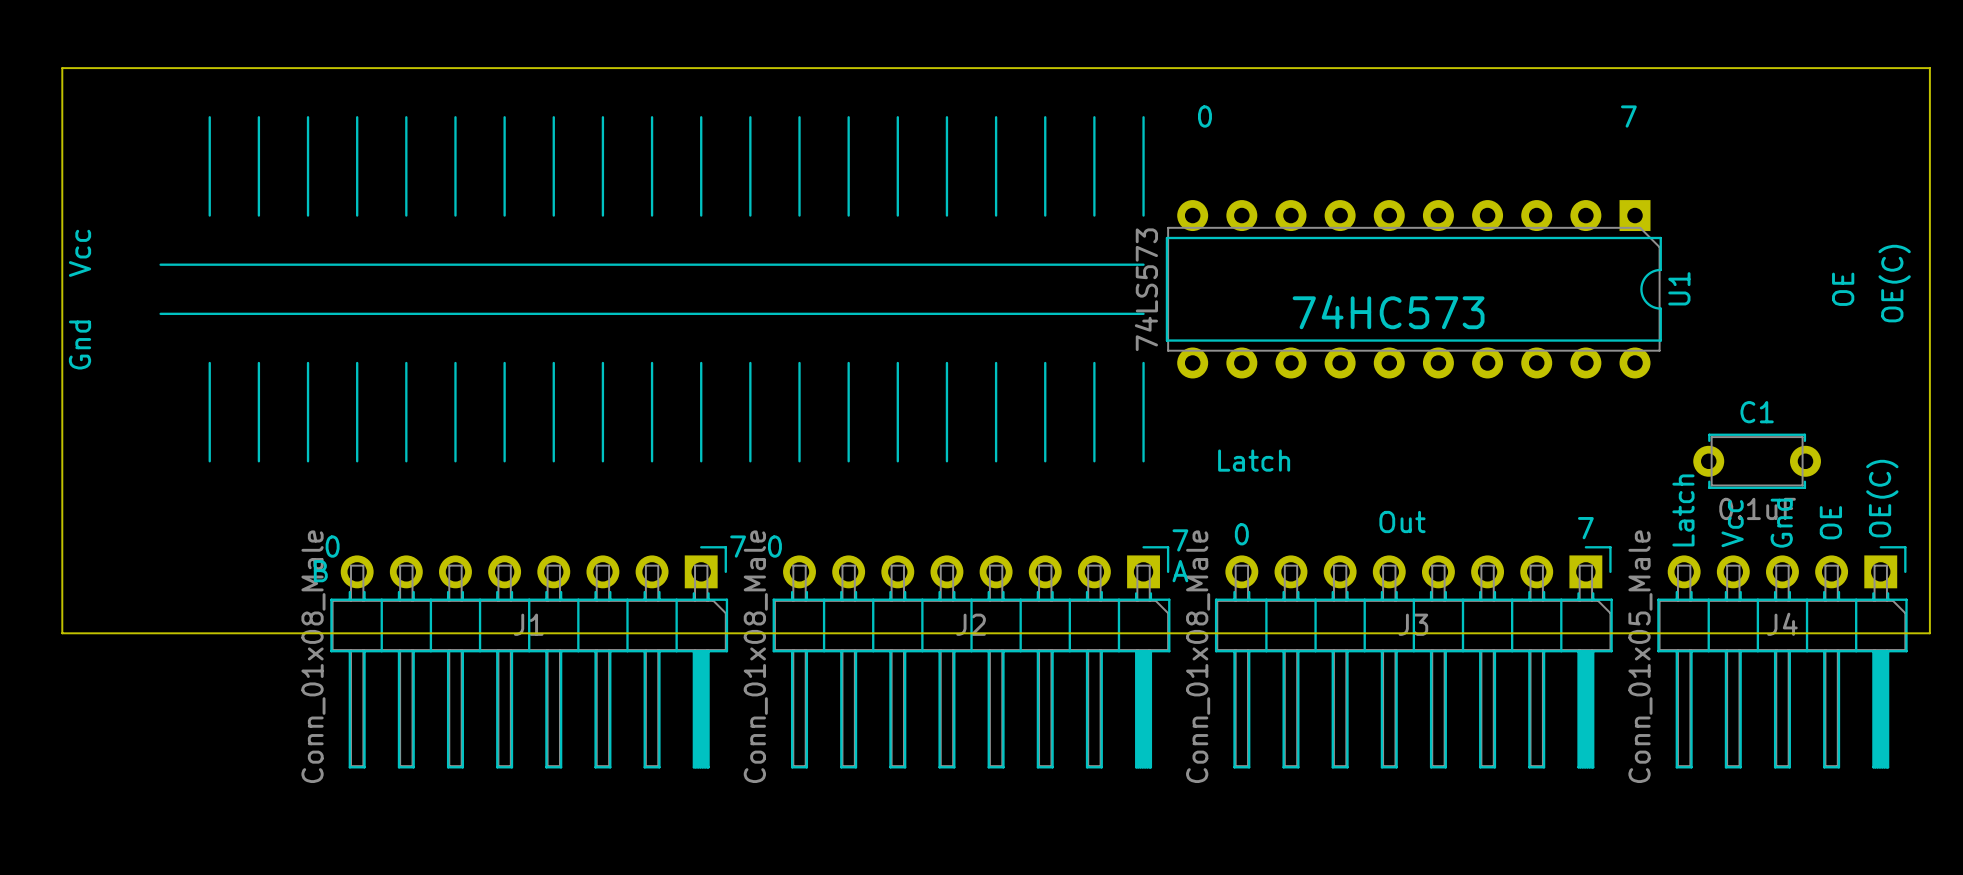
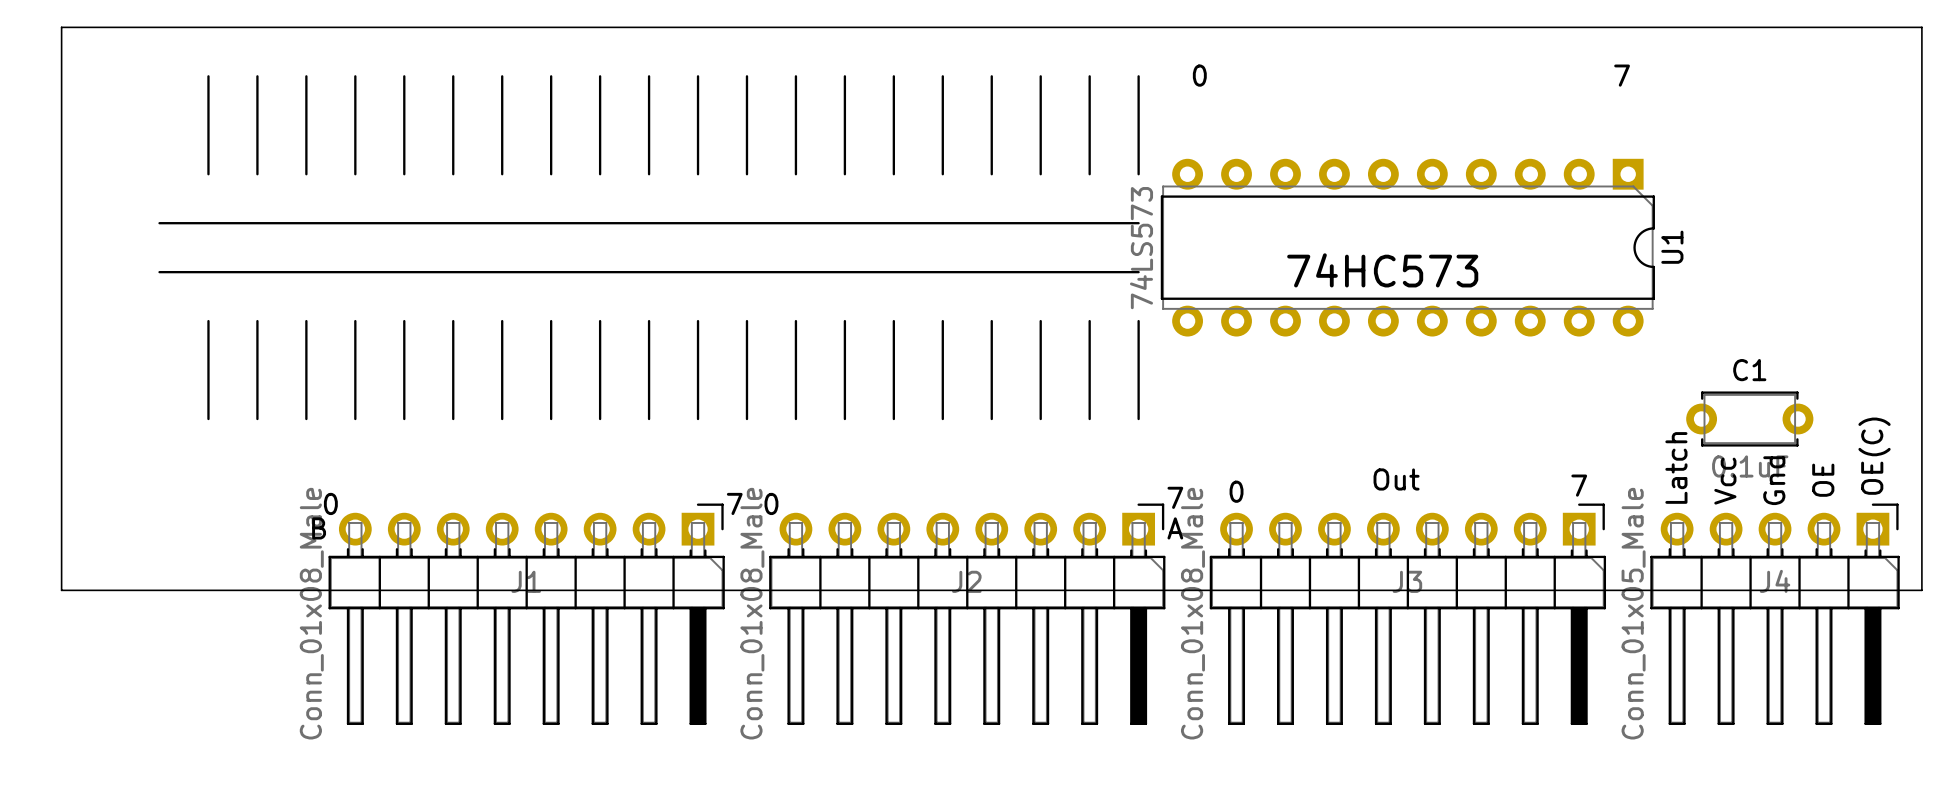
text: Vcc (80, 253) -> none
text: OE(C) (1894, 283) -> none
text: OE (1843, 289) -> none
text: Gnd (80, 345) -> none
text: Latch (1254, 460) -> none

